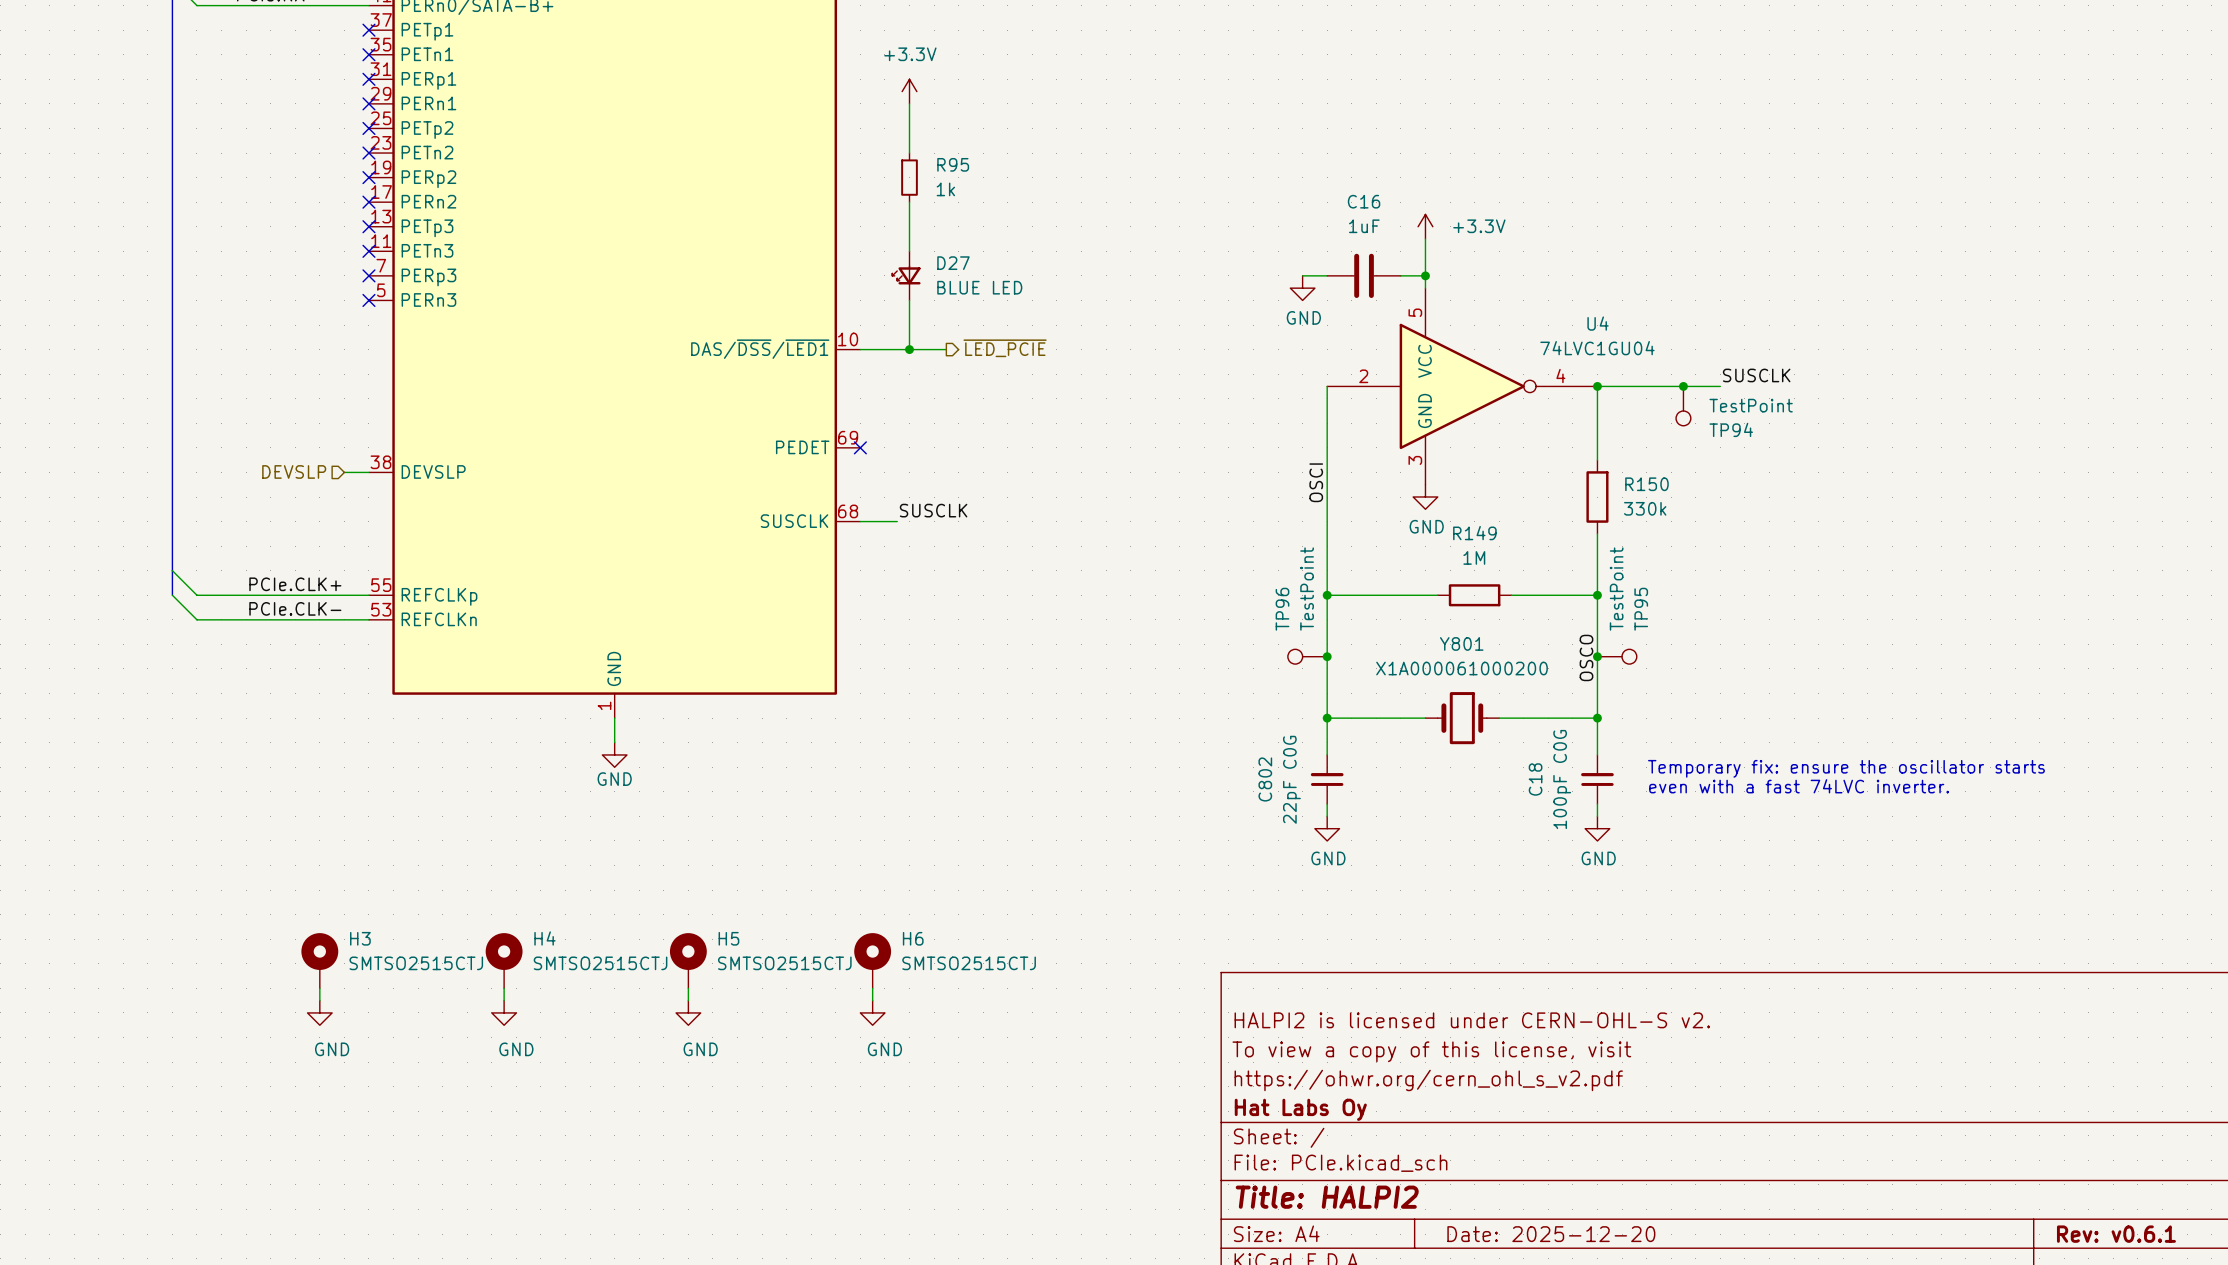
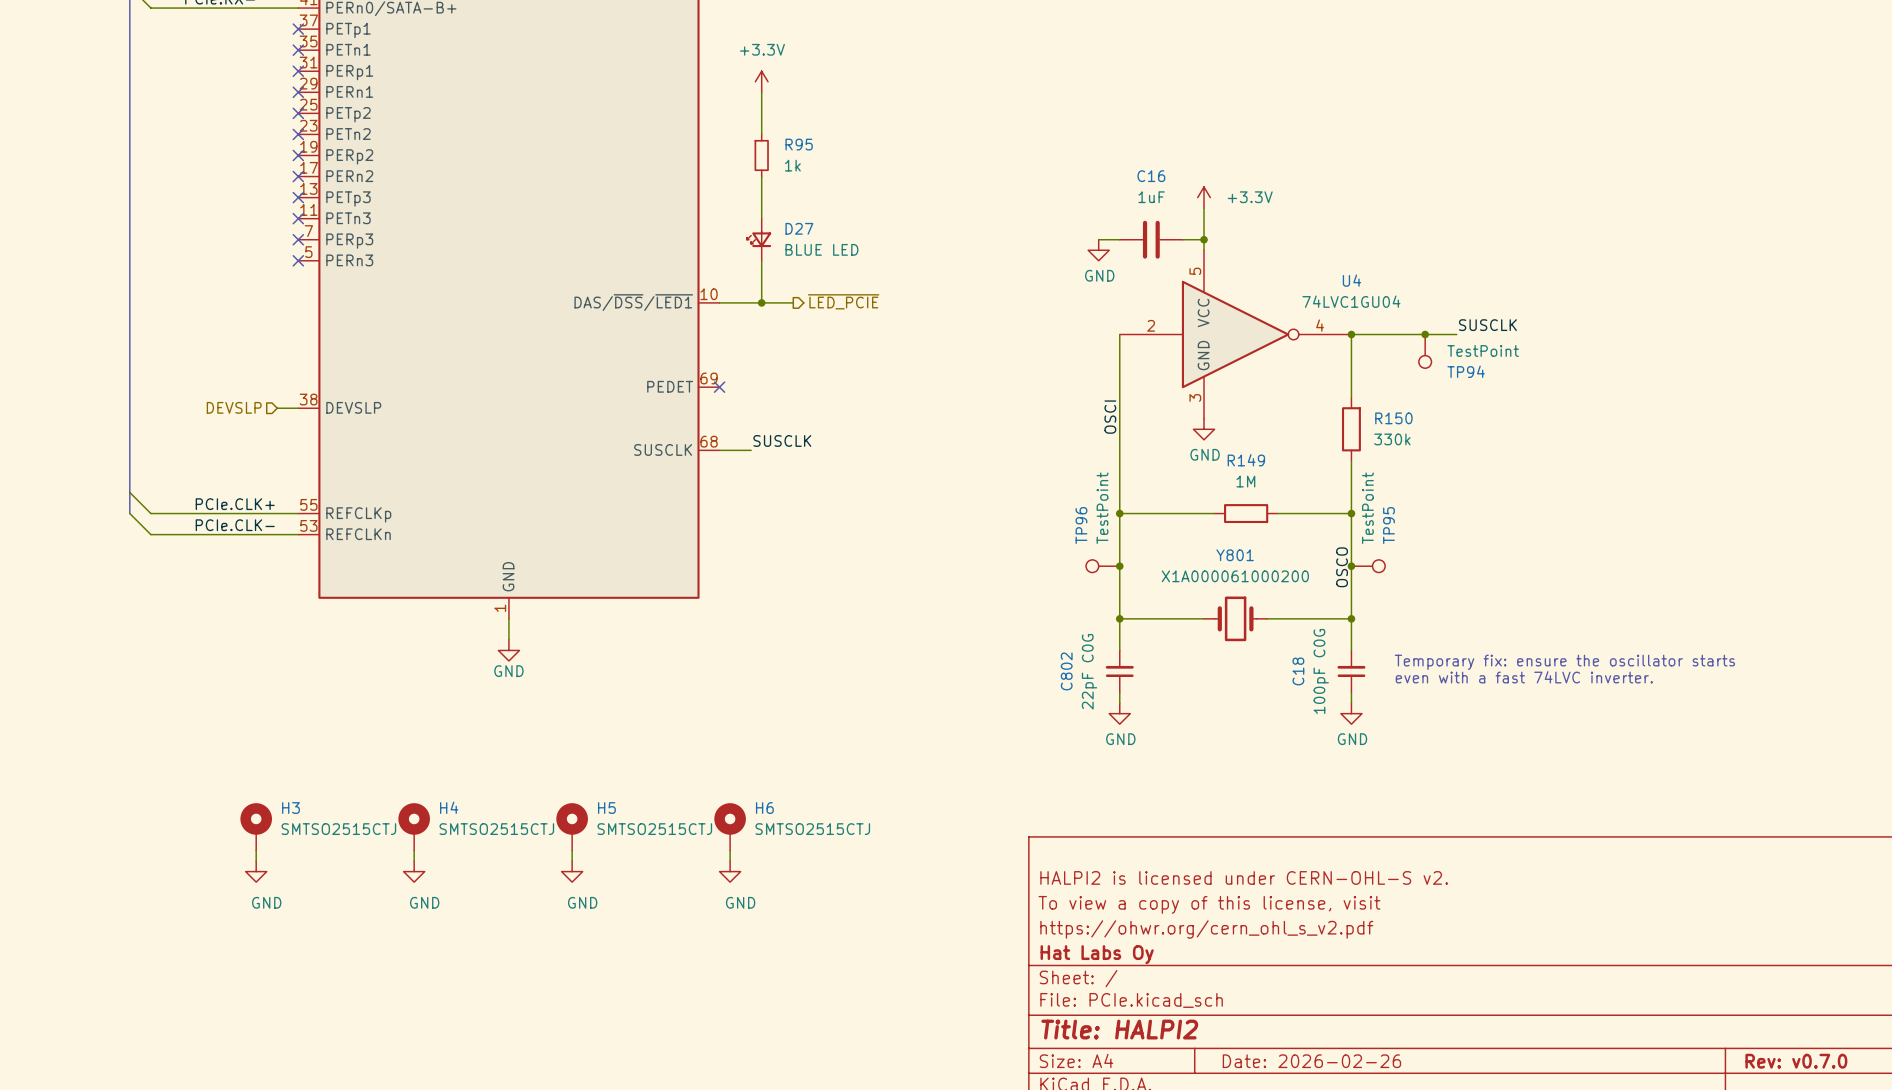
title block: Date: 2025-12-20 (1551, 1234) -> Date: 2026-02-26 (1311, 1061)
title block: Rev: v0.6.1 (2116, 1234) -> Rev: v0.7.0 (1796, 1061)

